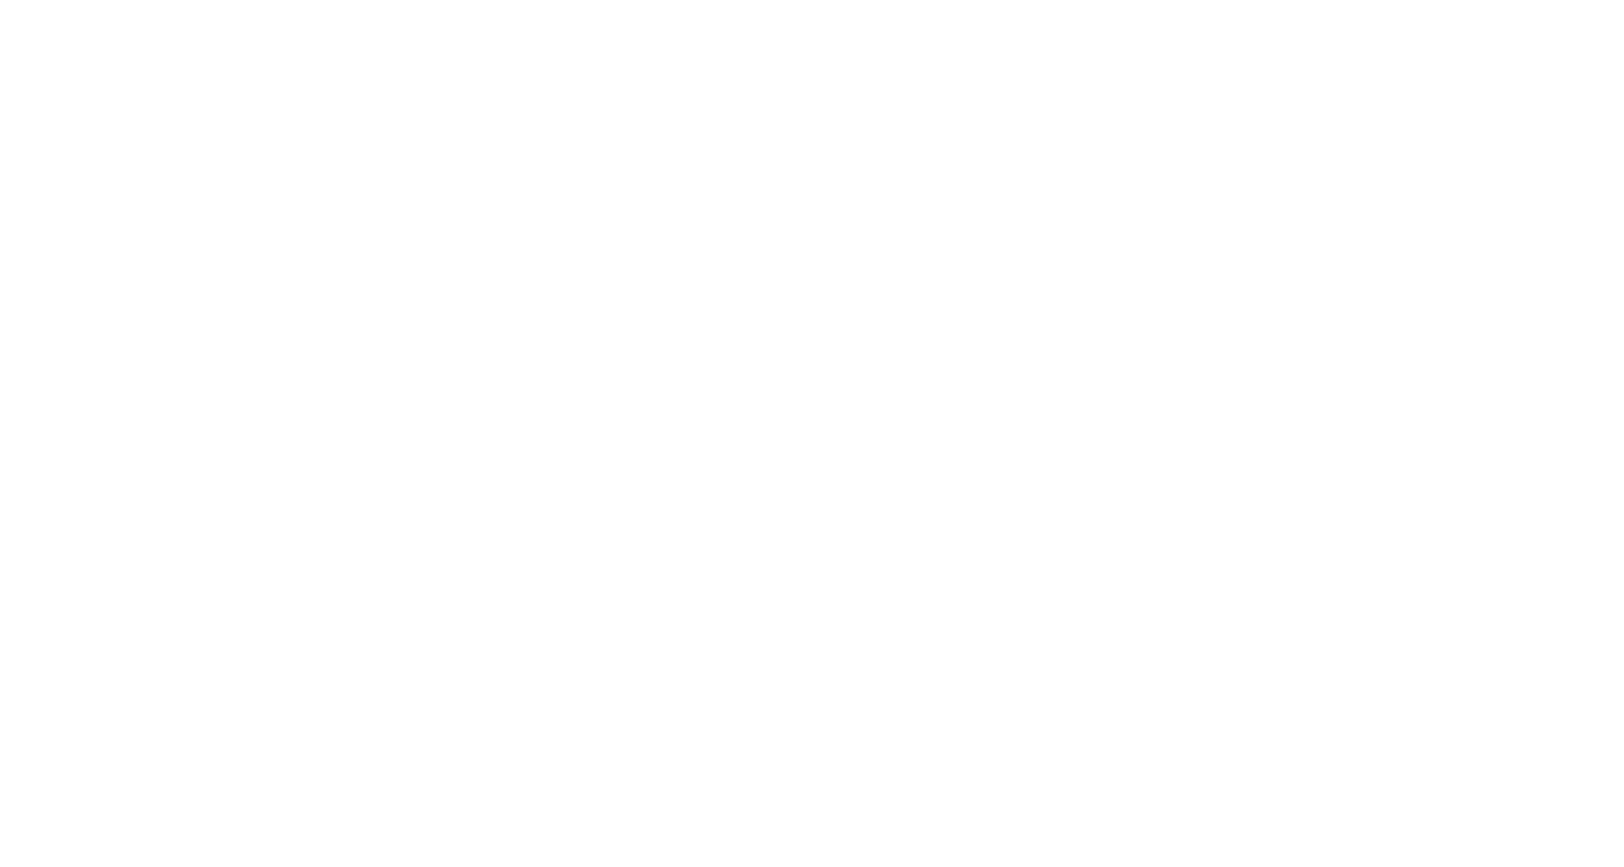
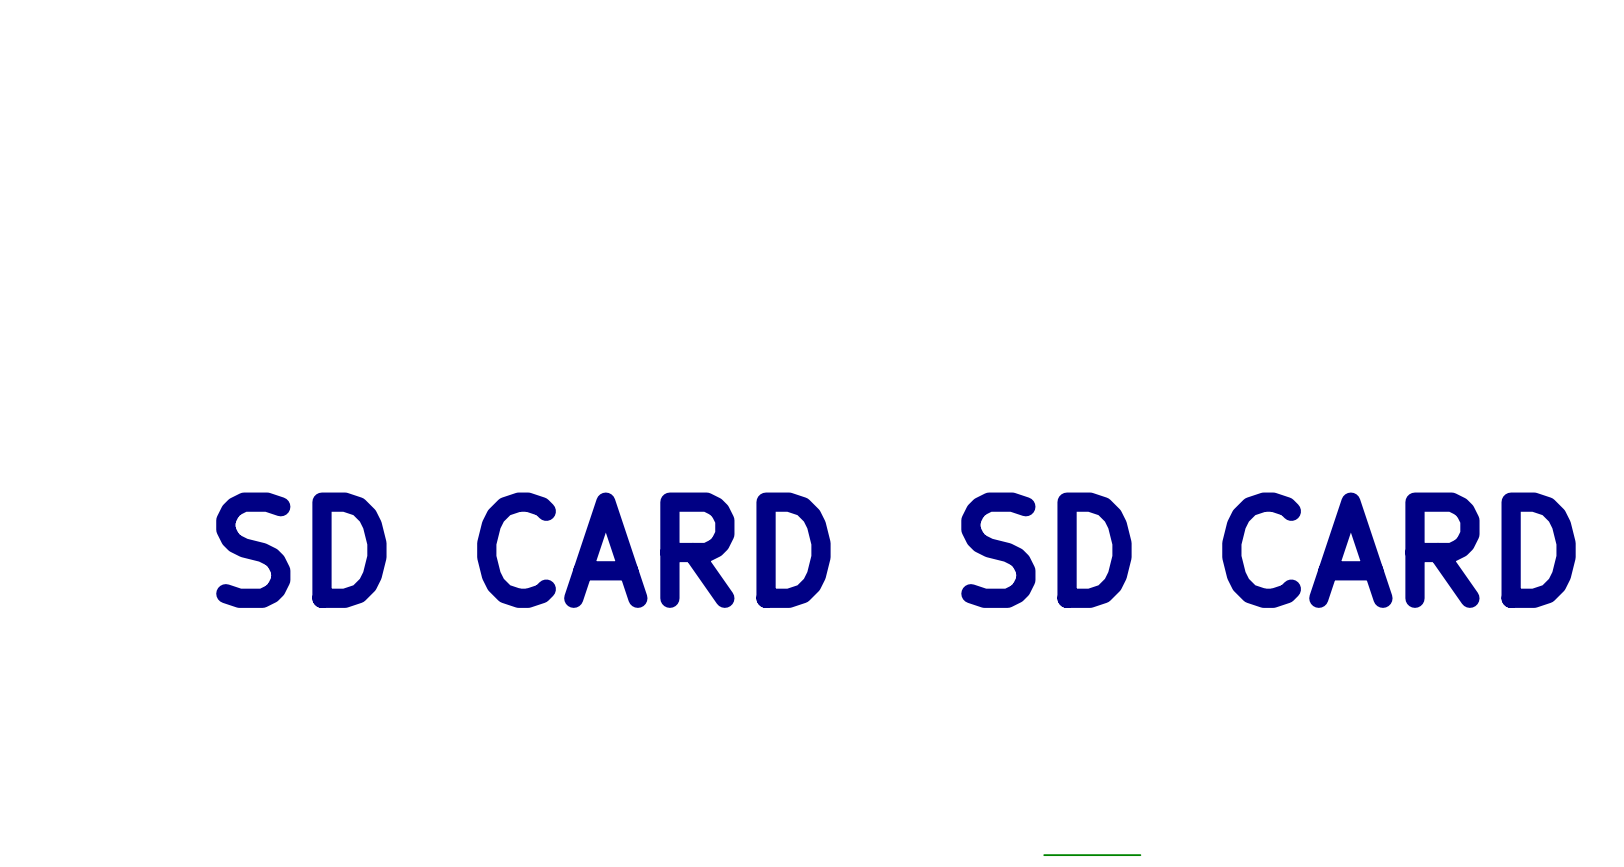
text: none -> SD CARD (523, 550)
text: none -> SD CARD (1268, 550)
wire: none -> (1044, 855) (1140, 855)

